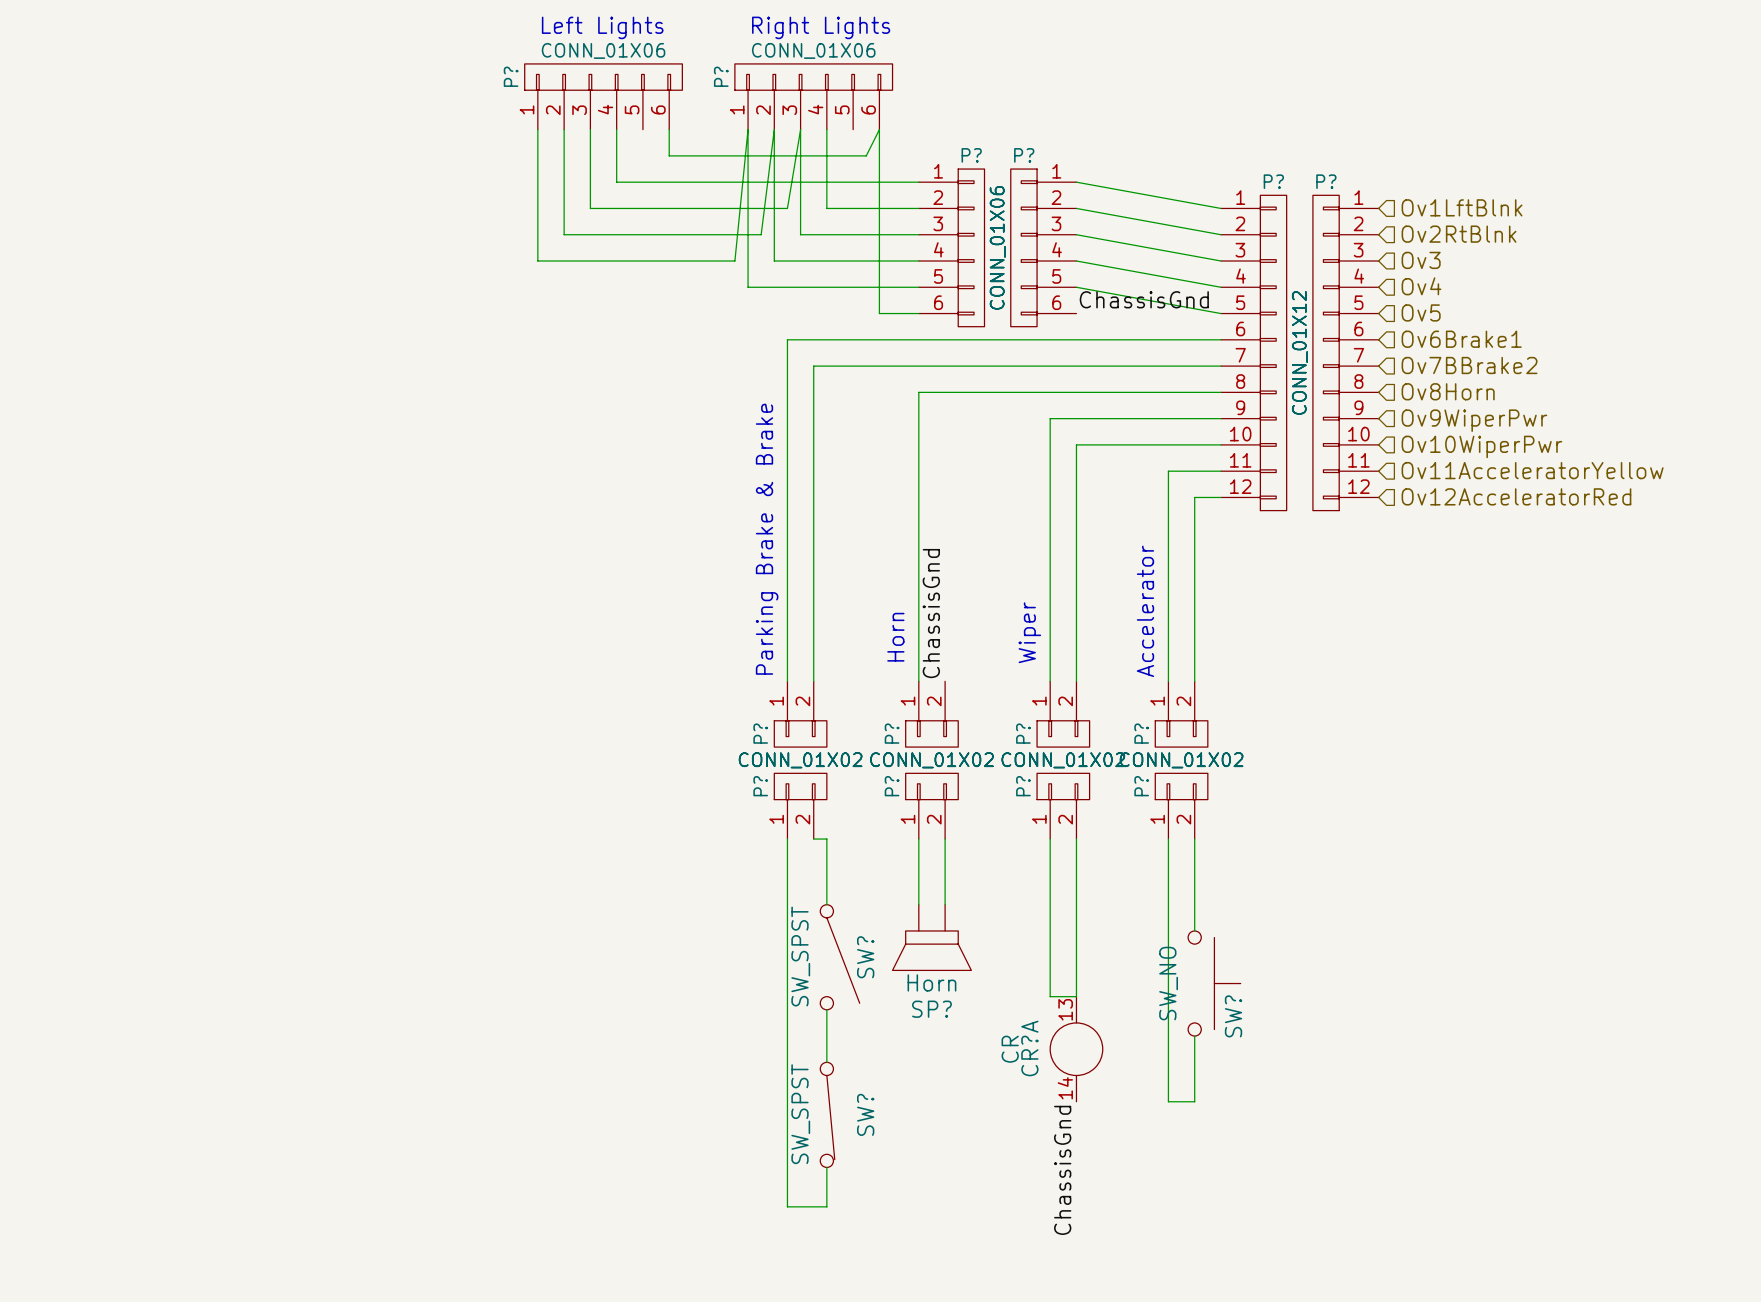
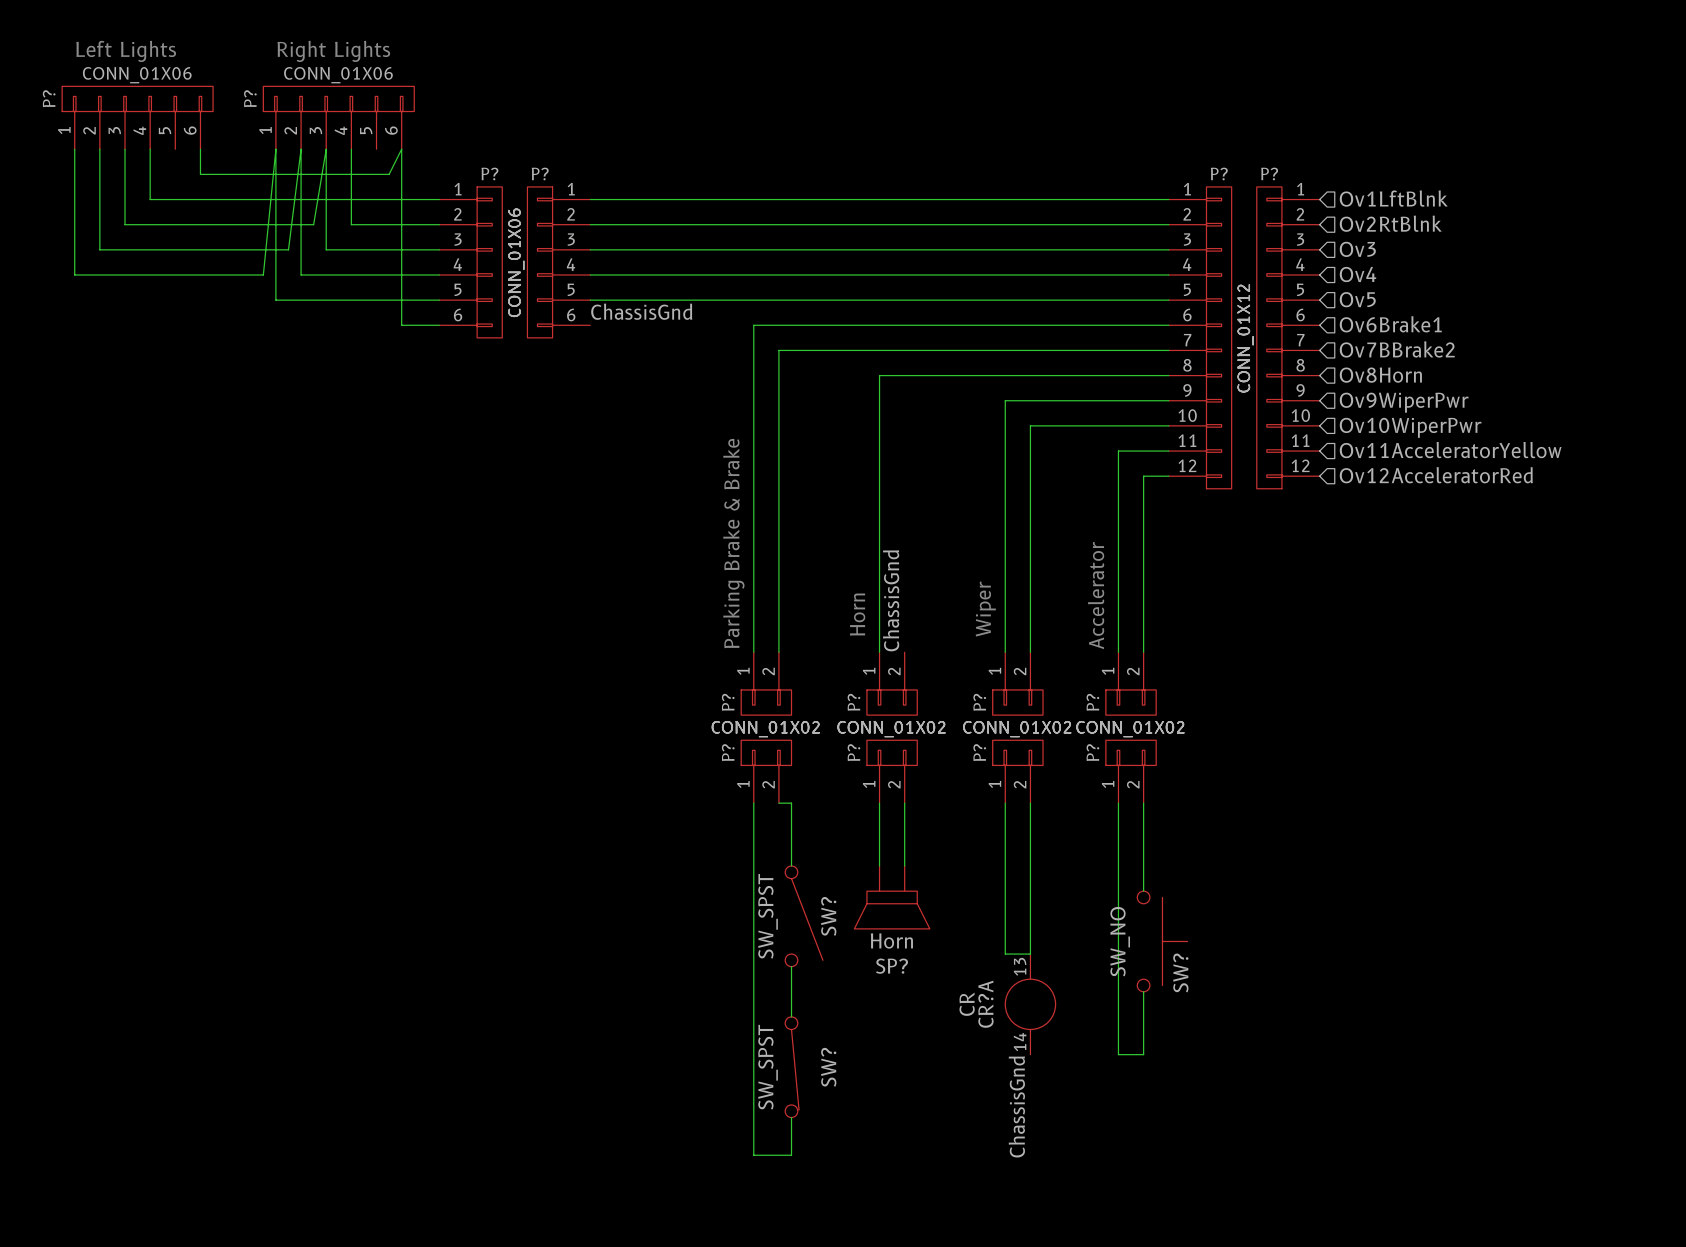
text: Left Lights (602, 27) -> none
text: Right Lights (821, 27) -> none
text: none -> Left Lights (126, 51)
text: none -> Right Lights (333, 51)
P?: CONN_01X06 (603, 96) -> none
P?: CONN_01X06 (813, 96) -> none
P?: none -> CONN_01X06 (137, 117)
P?: none -> CONN_01X06 (338, 117)
wire: (537, 129) (537, 261) (616, 261) -> none
wire: (564, 129) (564, 234) (616, 234) -> none
wire: (590, 129) (590, 208) (616, 208) -> none
wire: (616, 129) (616, 182) (918, 182) -> none
wire: (669, 129) (669, 155) (866, 155) (879, 129) (879, 313) -> (590, 300) (841, 300)
wire: (826, 129) (826, 208) -> none
wire: none -> (74, 149) (74, 274) (263, 274) (275, 149) (275, 300) (439, 300)
wire: none -> (99, 149) (99, 249) (288, 249) (301, 149) (301, 274) (439, 274)
wire: none -> (125, 149) (125, 224) (313, 224) (326, 149) (326, 249) (439, 249)
wire: none -> (150, 149) (150, 199) (439, 199)
wire: none -> (200, 149) (200, 174) (389, 174) (401, 149) (401, 325) (439, 325)
wire: none -> (351, 149) (351, 224) (439, 224)
wire: (1076, 182) (1220, 208) -> (879, 199) (1168, 199)
wire: (787, 208) (800, 129) (800, 234) -> (753, 199) (791, 199)
wire: (1076, 208) (1220, 234) -> (879, 224) (1168, 224)
wire: (761, 234) (774, 129) (774, 261) -> (728, 224) (766, 224)
wire: (1076, 234) (1220, 261) -> (879, 249) (1168, 249)
P?: CONN_01X06 (951, 247) -> none
P?: CONN_01X06 (1043, 247) -> none
wire: (734, 261) (748, 129) (748, 287) -> (703, 249) (741, 249)
wire: (1076, 261) (1220, 287) -> (879, 274) (1168, 274)
P?: none -> CONN_01X06 (470, 262)
P?: none -> CONN_01X06 (558, 262)
wire: none -> (590, 274) (716, 274)
wire: (1076, 287) (1220, 313) -> (879, 300) (1168, 300)
label: ChassisGnd (1144, 299) -> none
label: none -> ChassisGnd (641, 311)

